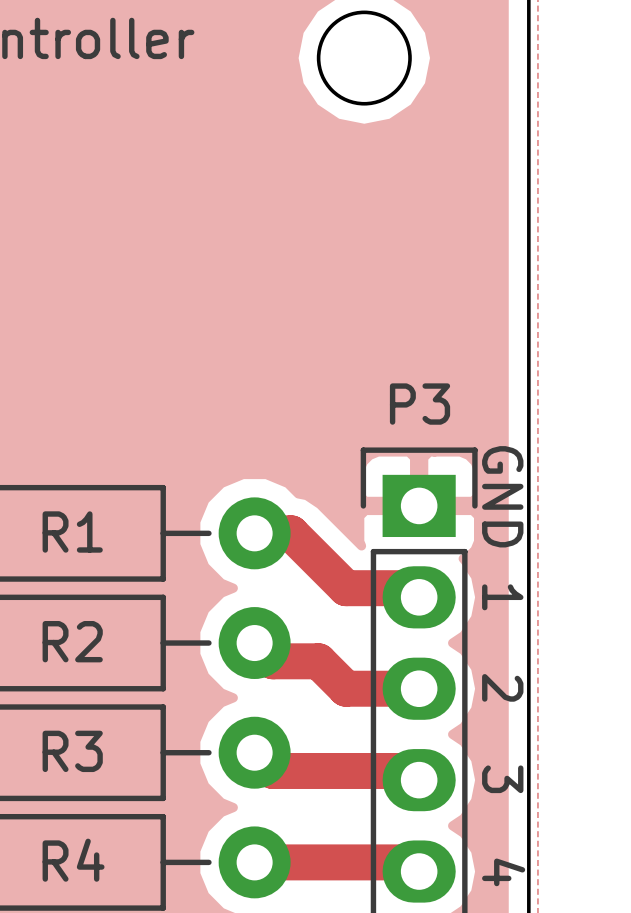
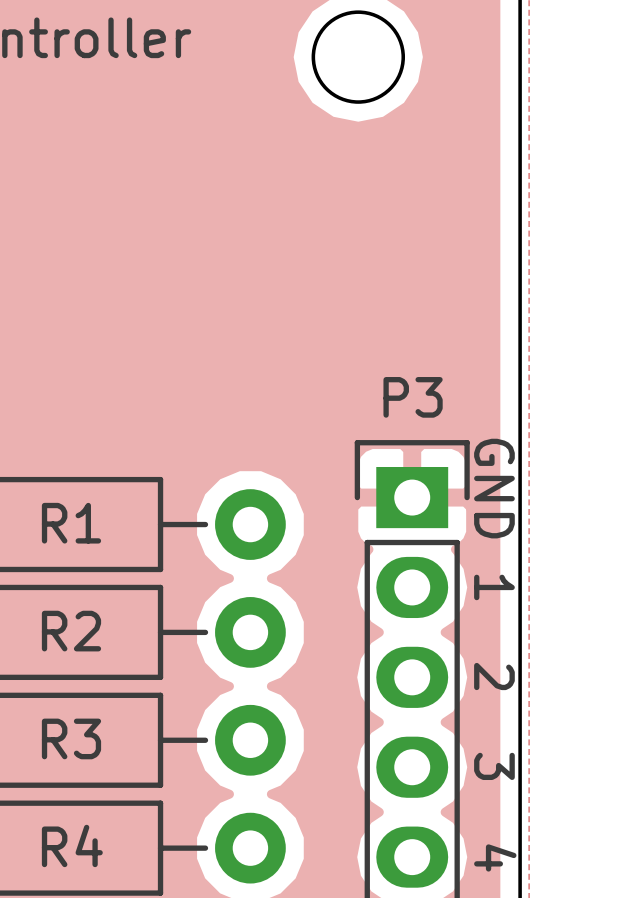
track: (254, 533) (291, 533) (346, 588) (410, 588) (419, 597) -> none
track: (254, 643) (272, 661) (318, 661) (346, 688) (419, 688) -> none
track: (254, 752) (272, 770) (410, 770) (419, 780) -> none
track: (254, 862) (410, 862) (419, 871) -> none

